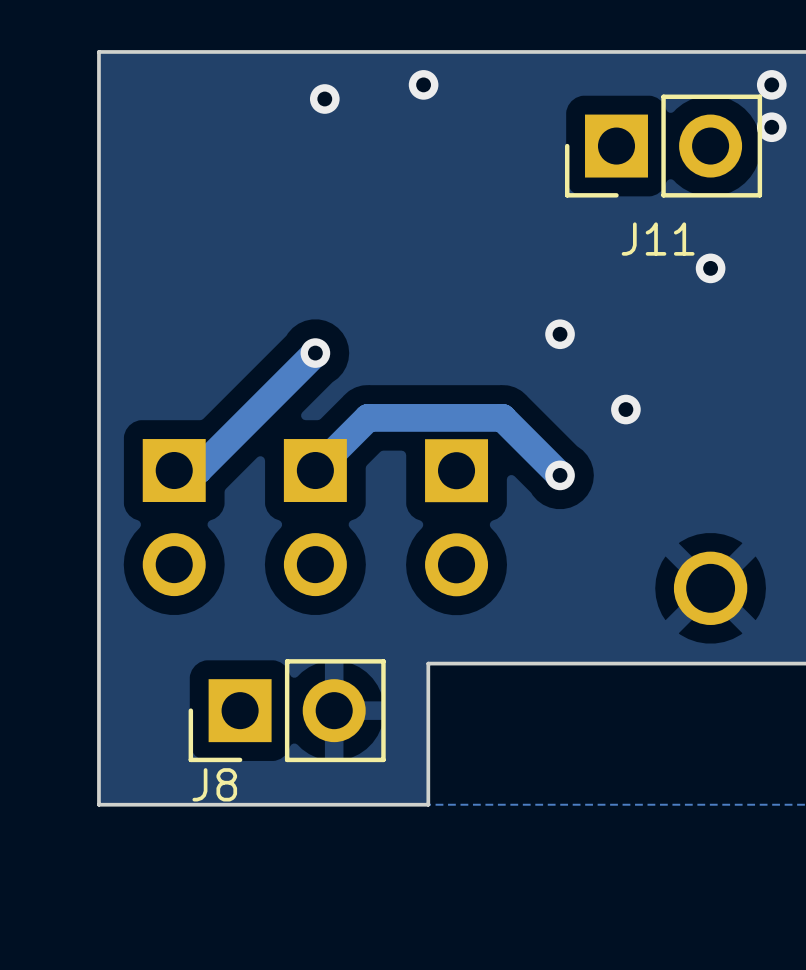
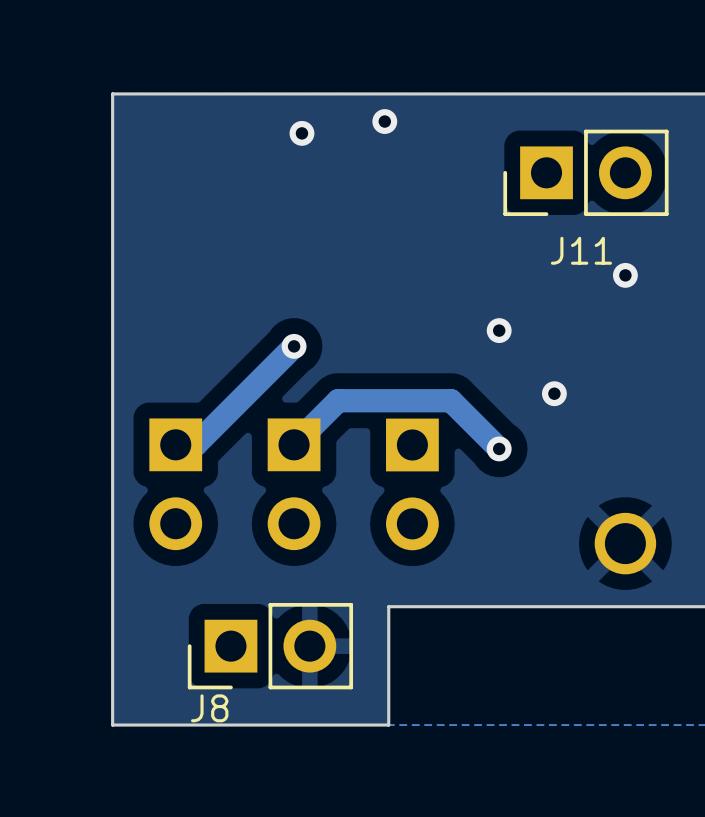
via: (771, 84) -> none
via: (771, 127) -> none

